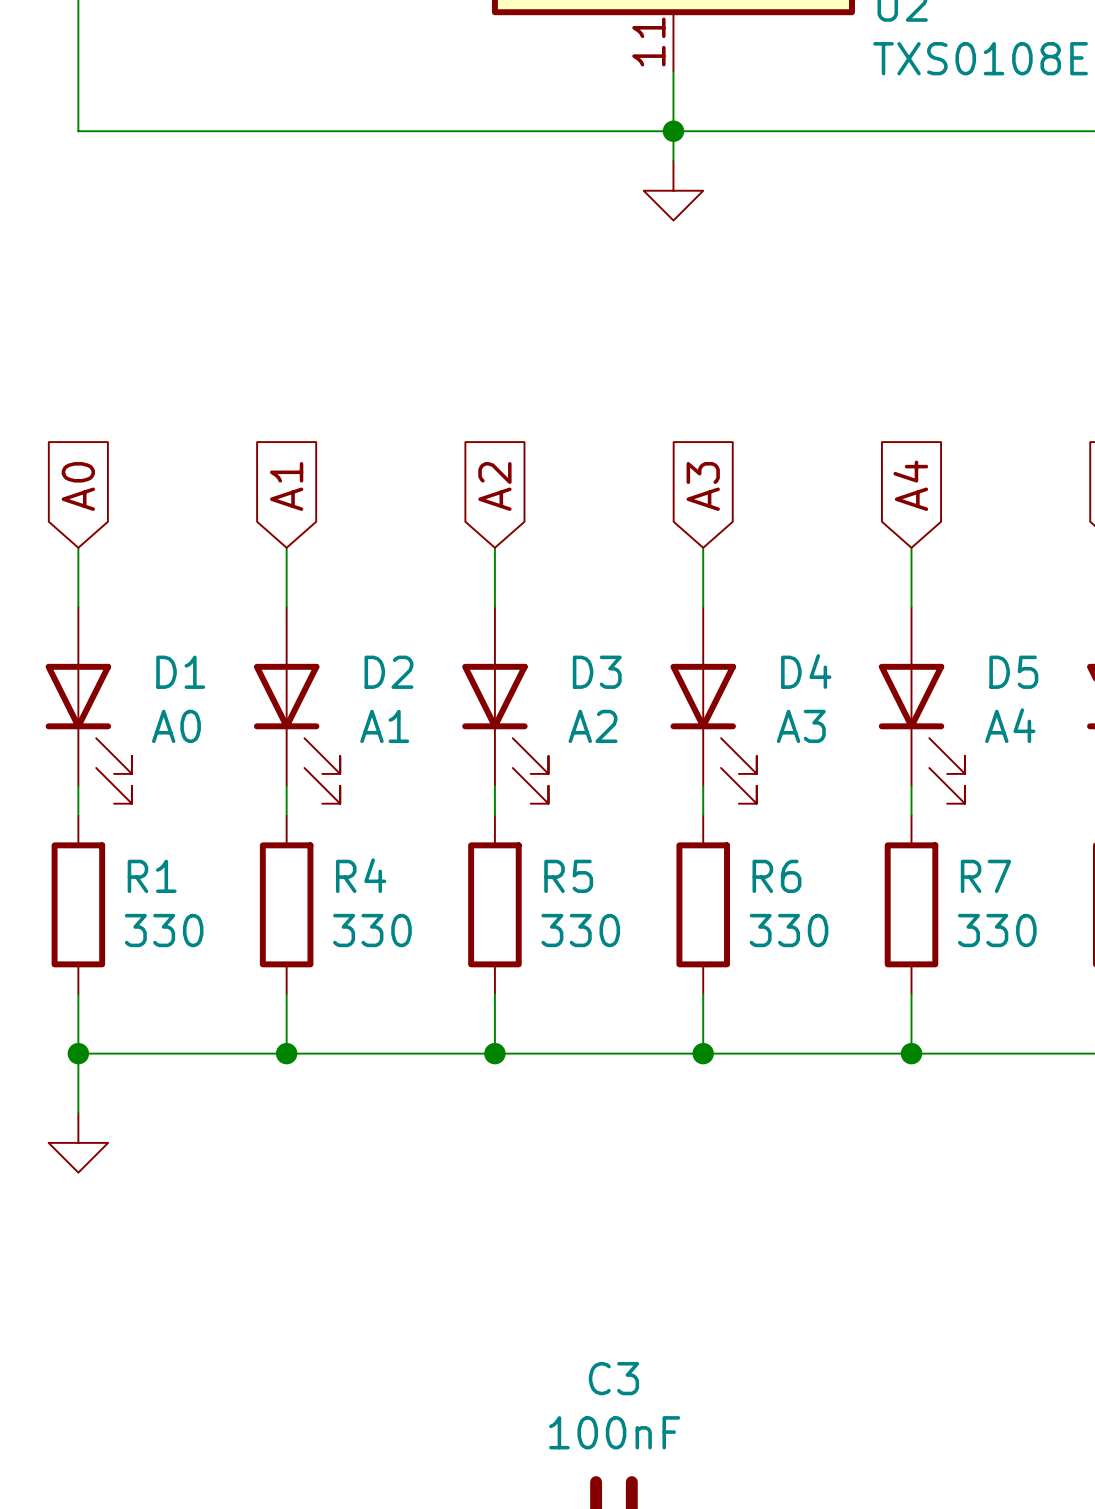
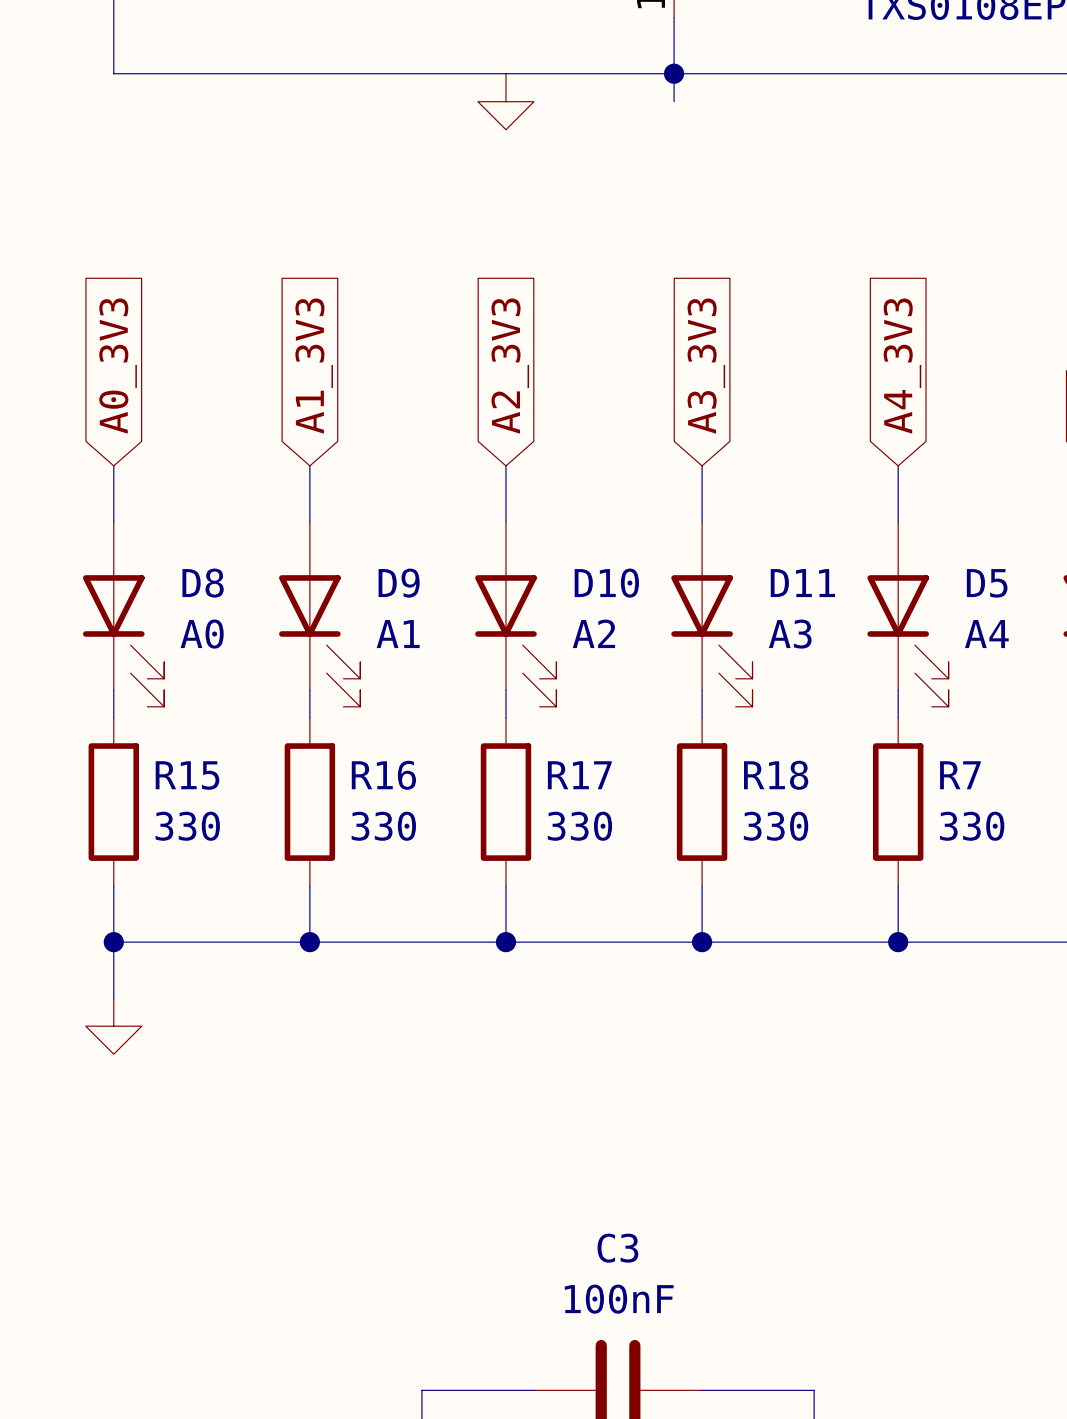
power symbol position: (673, 190) -> (505, 101)
global label: A4 (910, 485) -> A4_3V3 (902, 366)
global label: A0 (78, 486) -> A0_3V3 (118, 366)
global label: A1 (286, 486) -> A1_3V3 (314, 366)
global label: A2 (494, 486) -> A2_3V3 (510, 366)
global label: A3 (703, 486) -> A3_3V3 (706, 366)
D4 name: D4 (806, 671) -> D11 (802, 583)
D1 name: D1 (180, 672) -> D8 (203, 583)
D2 name: D2 (388, 672) -> D9 (399, 583)
D3 name: D3 (597, 672) -> D10 (606, 583)
R4 name: R4 (361, 875) -> R16 (383, 775)
R1 name: R1 (152, 876) -> R15 (187, 775)
R5 name: R5 (568, 876) -> R17 (579, 775)
R6 name: R6 (776, 876) -> R18 (776, 775)

